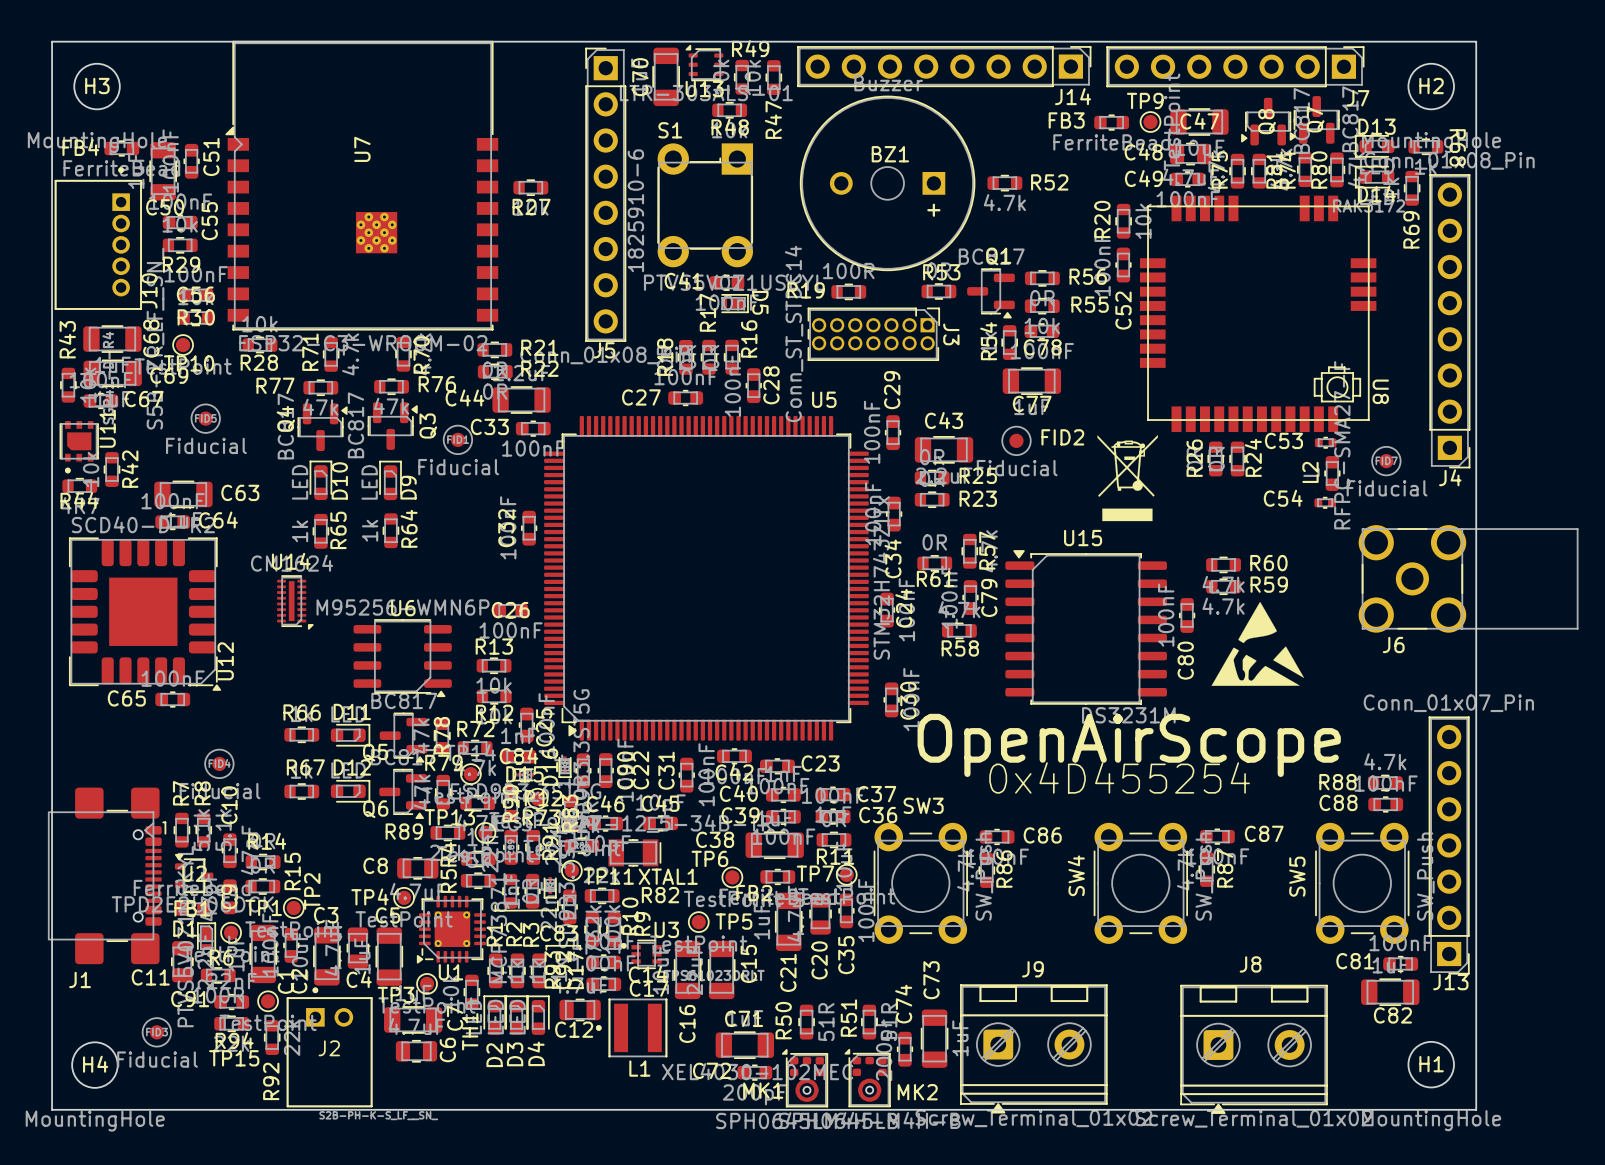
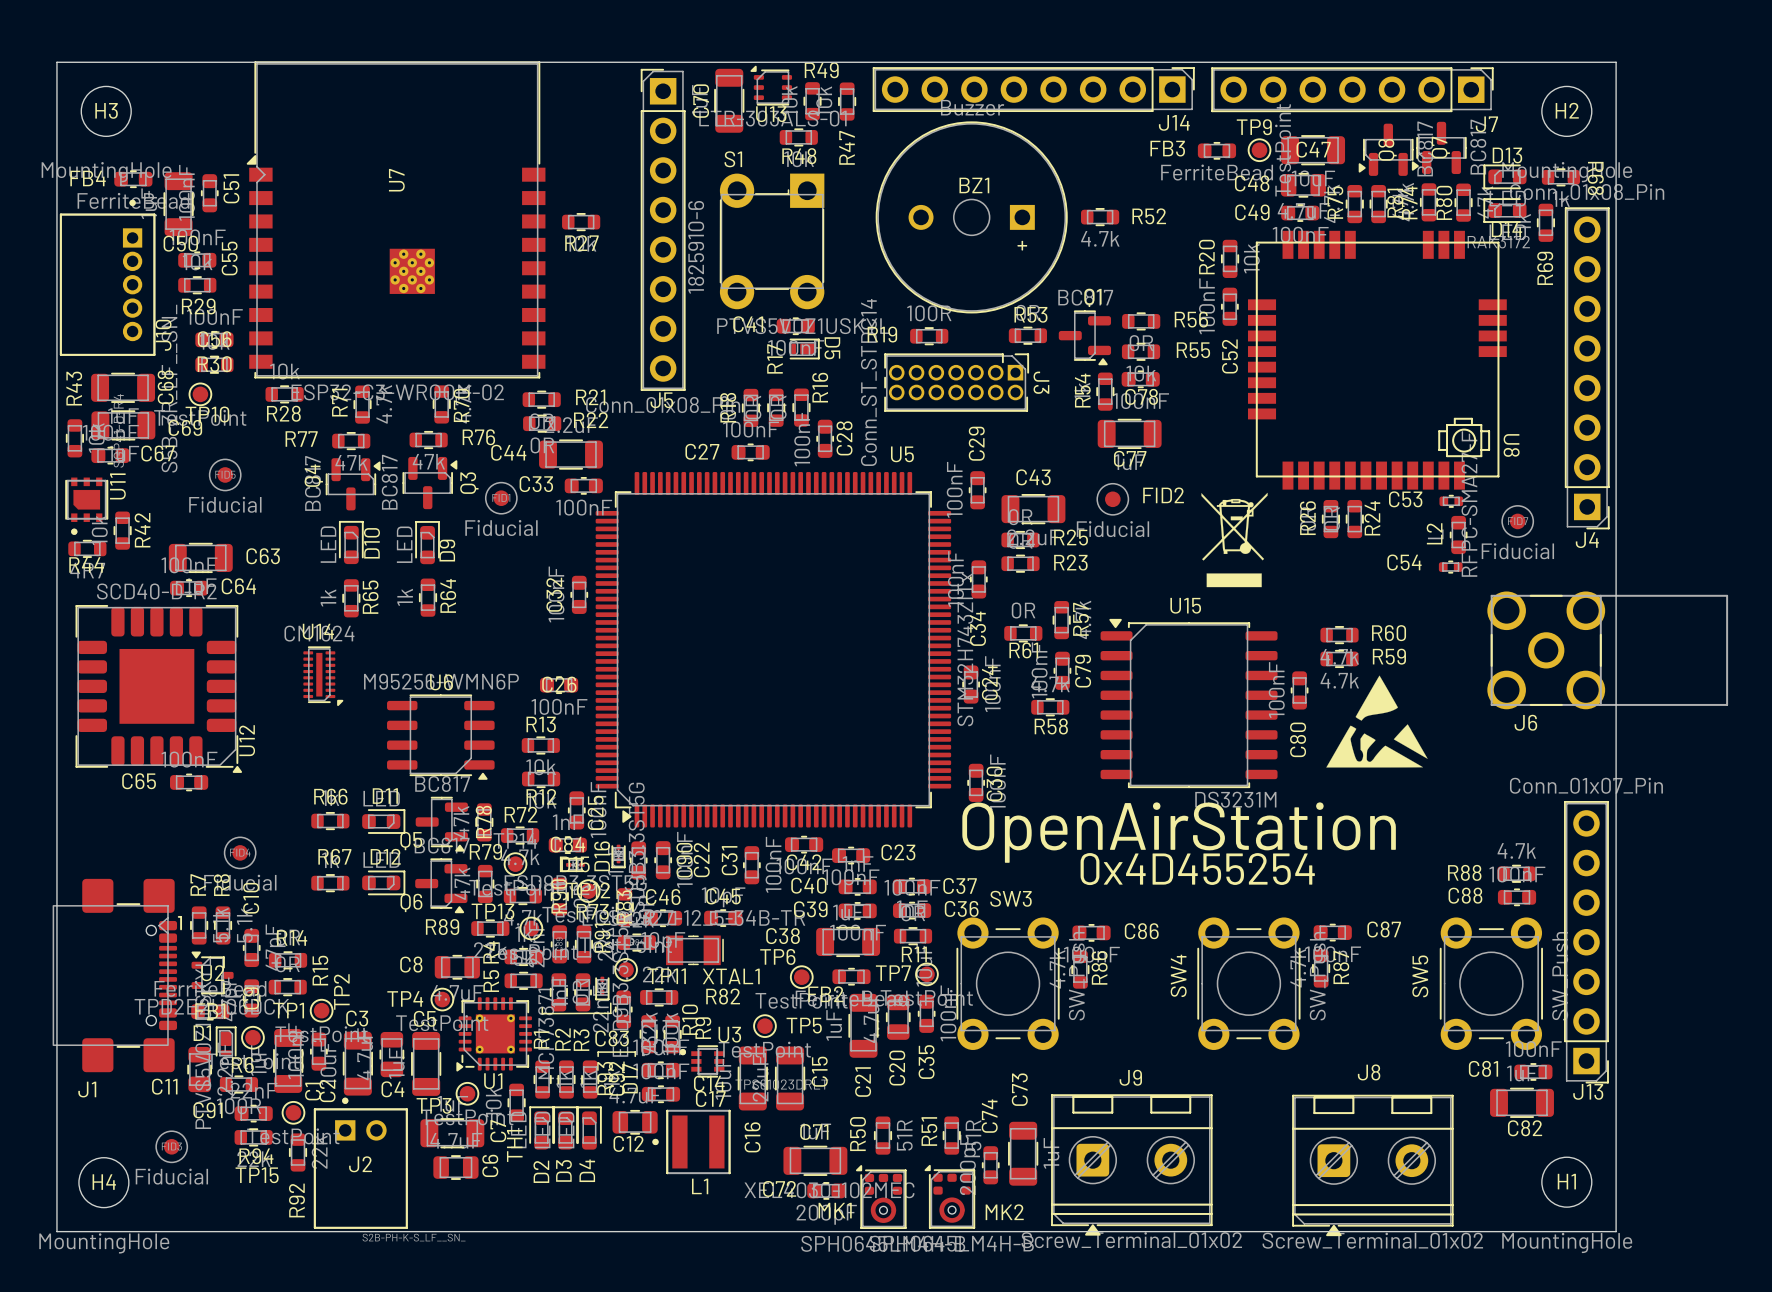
text: OpenAirScope (1129, 745) -> OpenAirStation (1179, 832)

